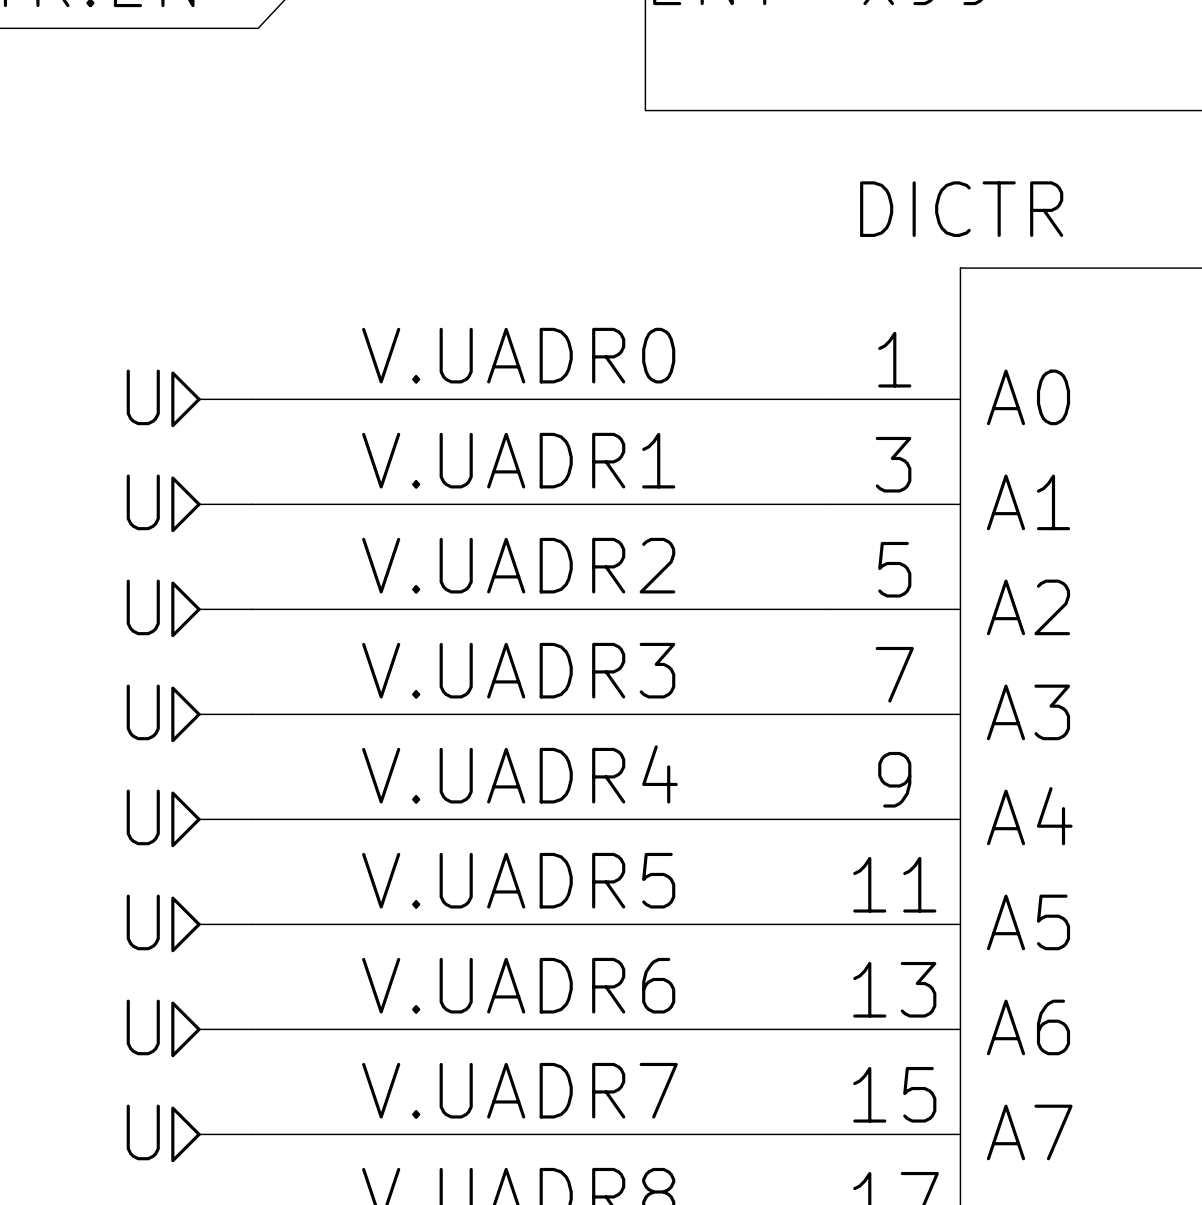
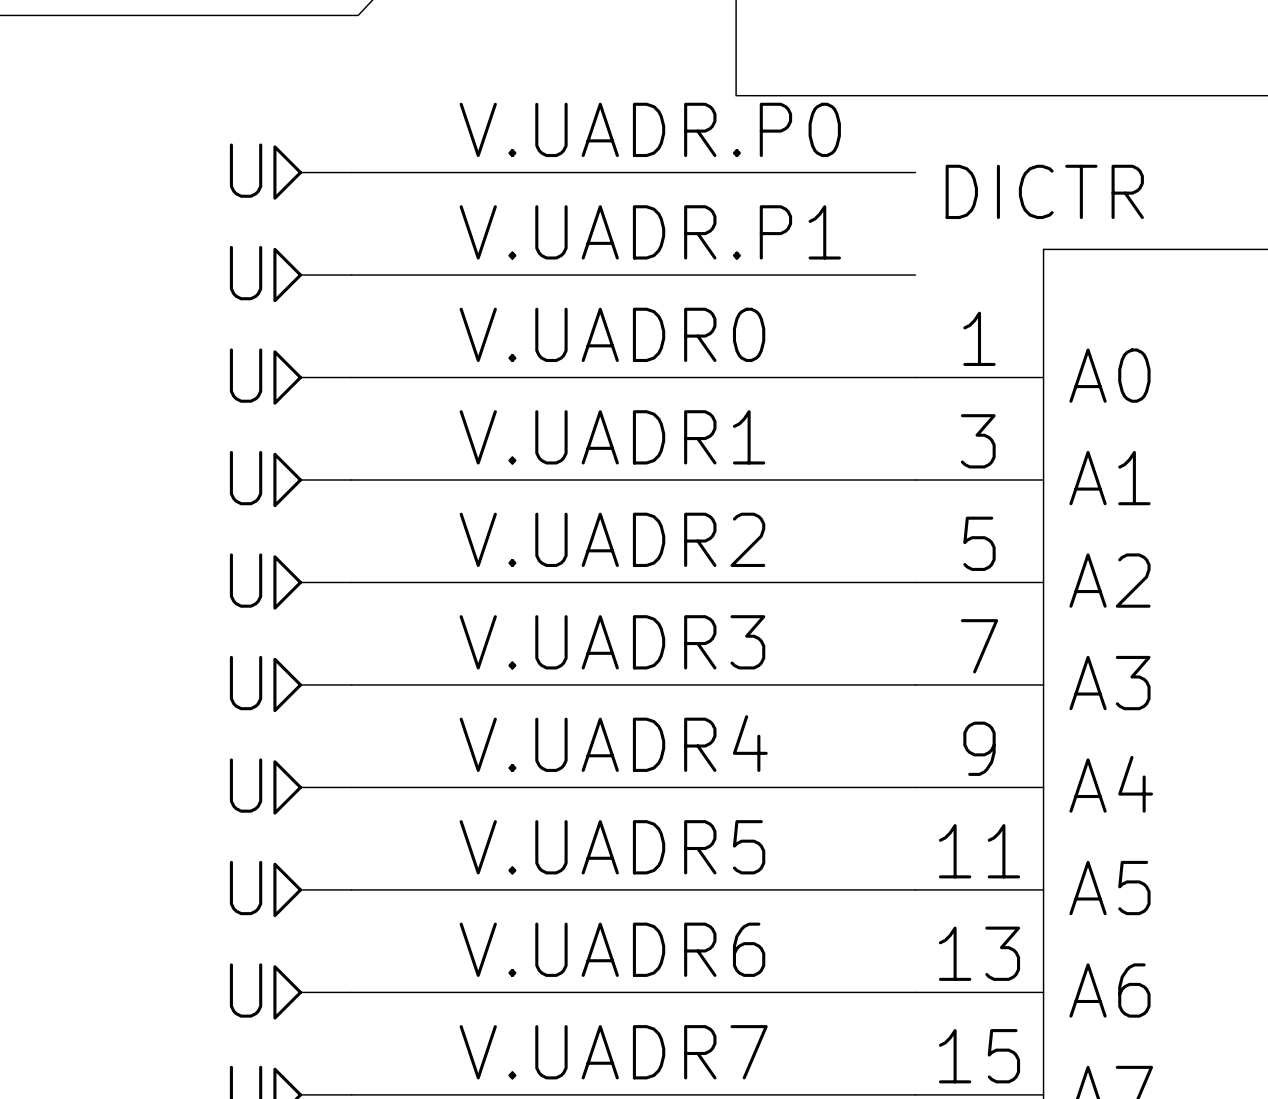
label: none -> V.UADR.P0 (650, 129)
U: none -> (312, 172)
wire: none -> (351, 172) (915, 172)
label: none -> V.UADR.P1 (650, 232)
U: none -> (312, 275)
wire: none -> (351, 275) (915, 275)

